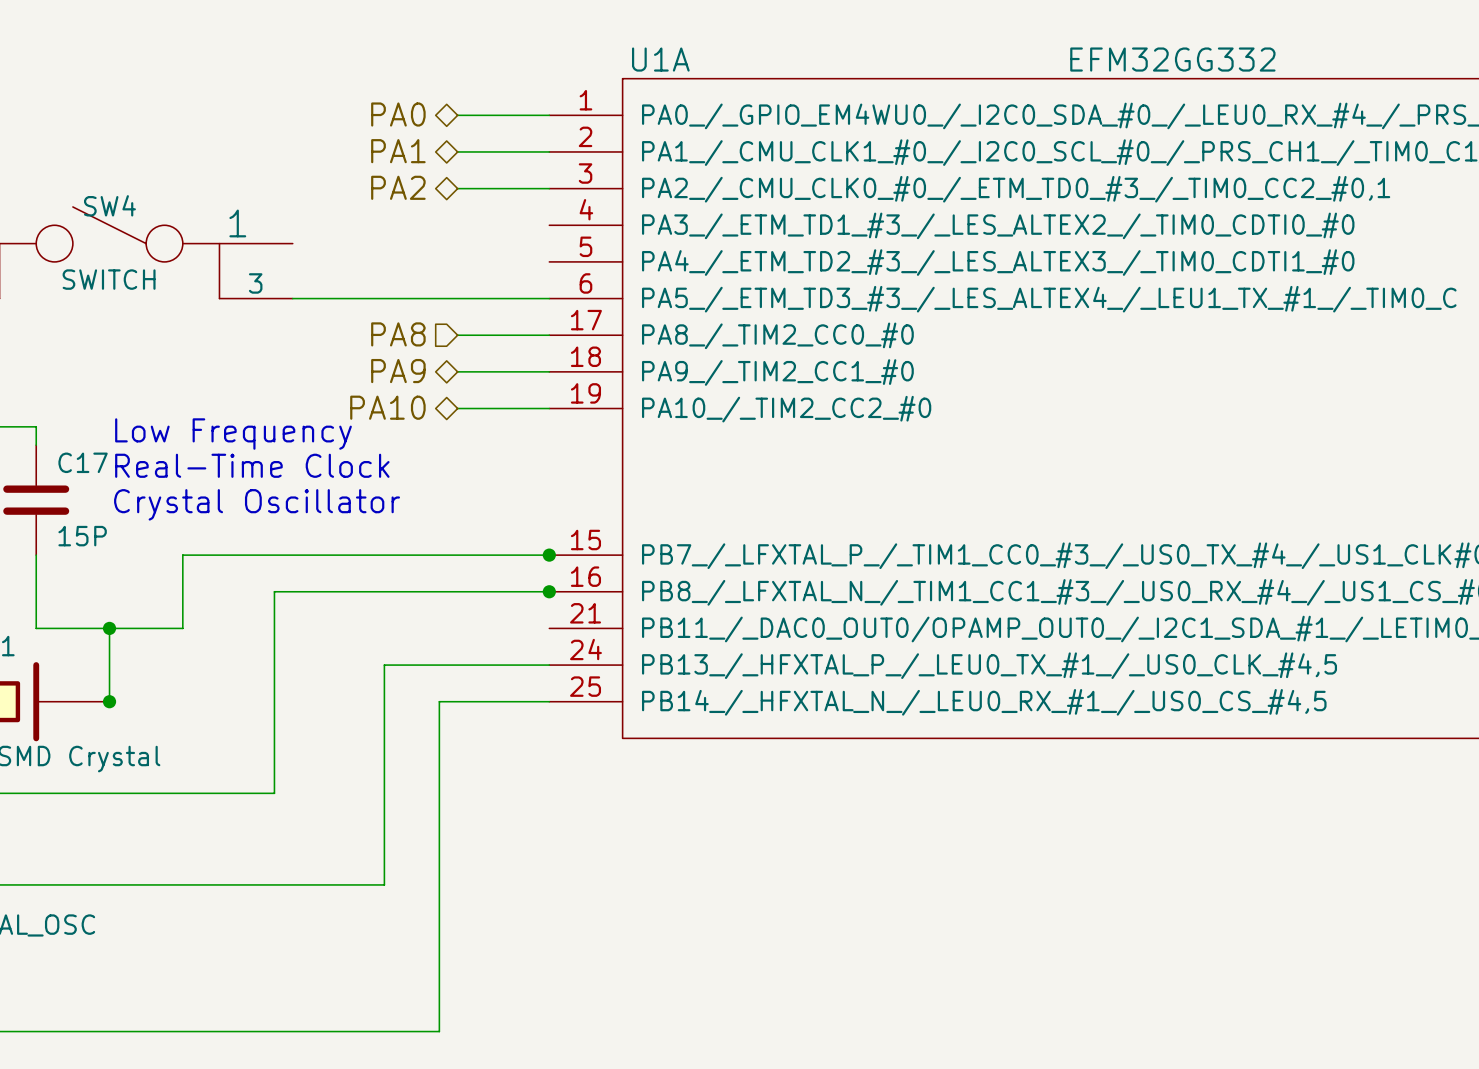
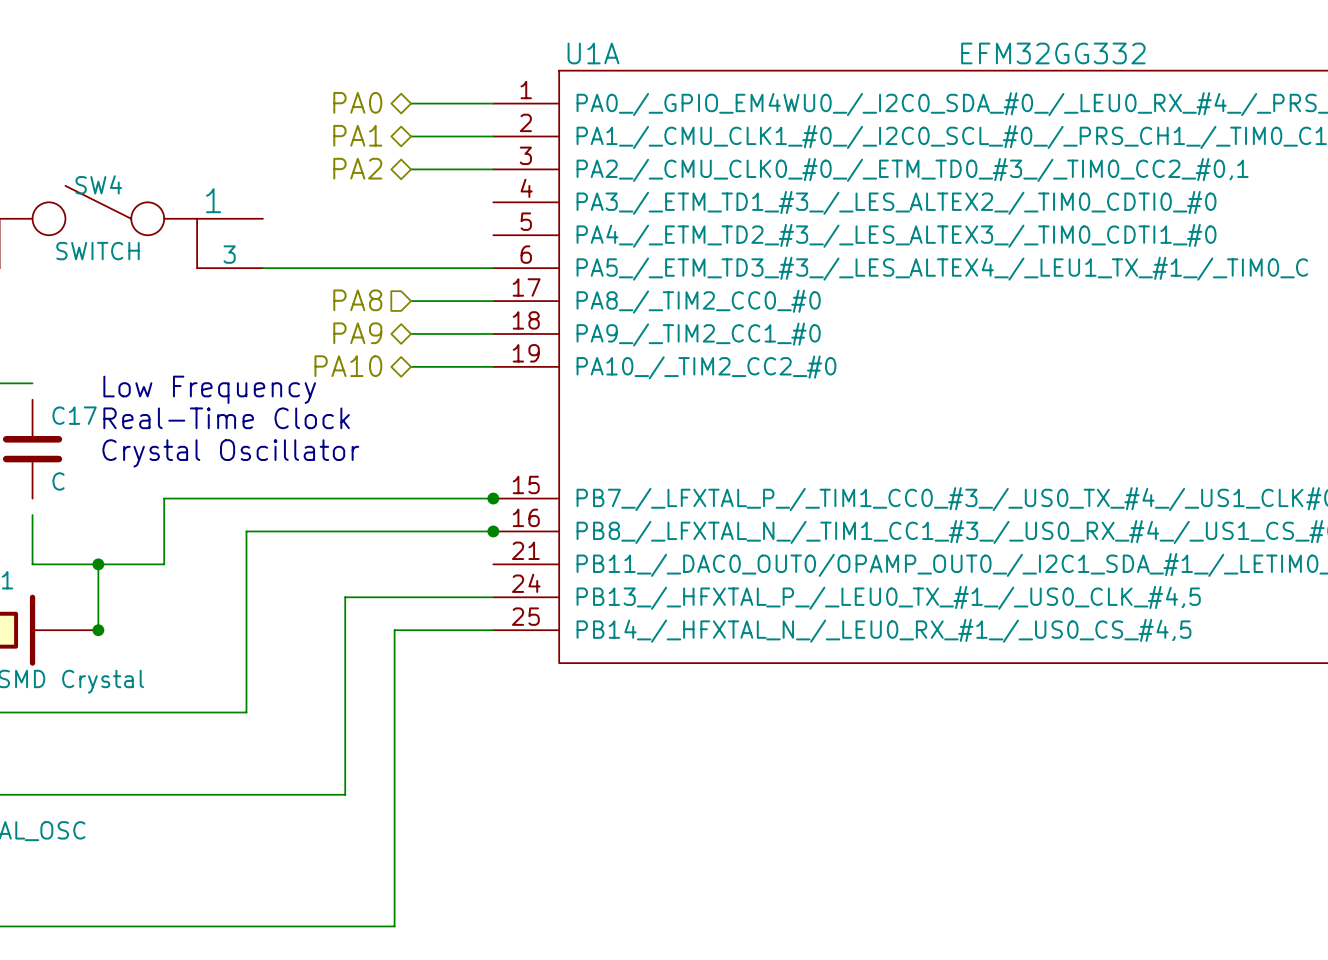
wire: (36, 426) (36, 445) -> none
C17 value: 15P (82, 536) -> C (58, 481)
wire: (36, 555) (36, 573) -> none

